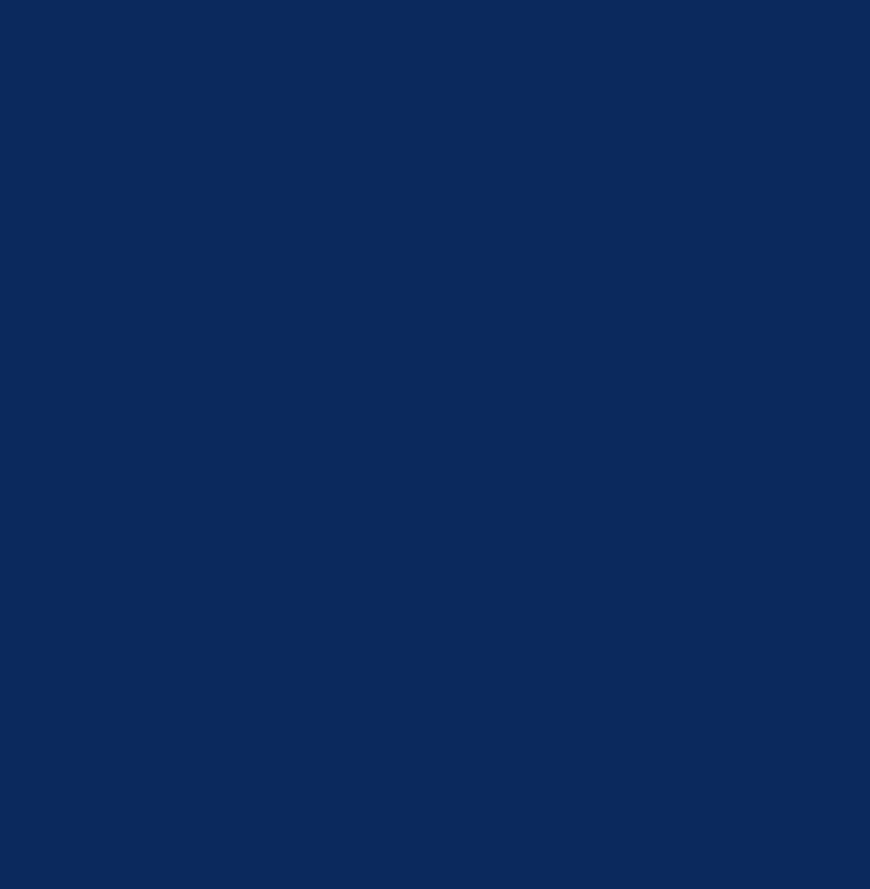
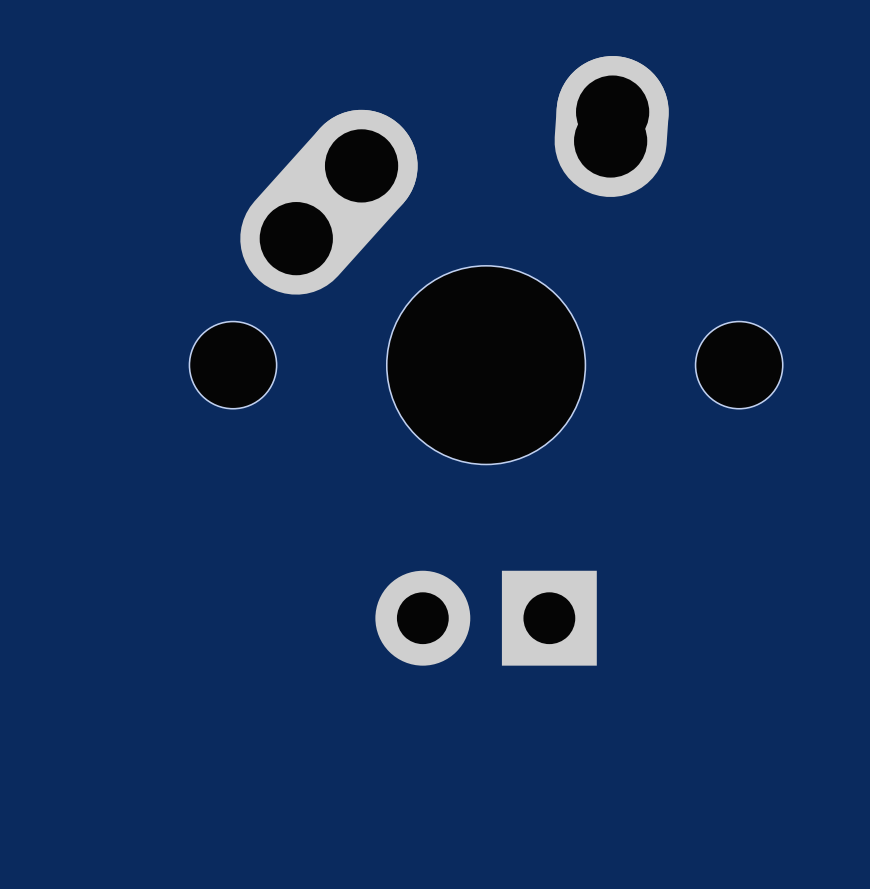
part: none -> (486, 360)

